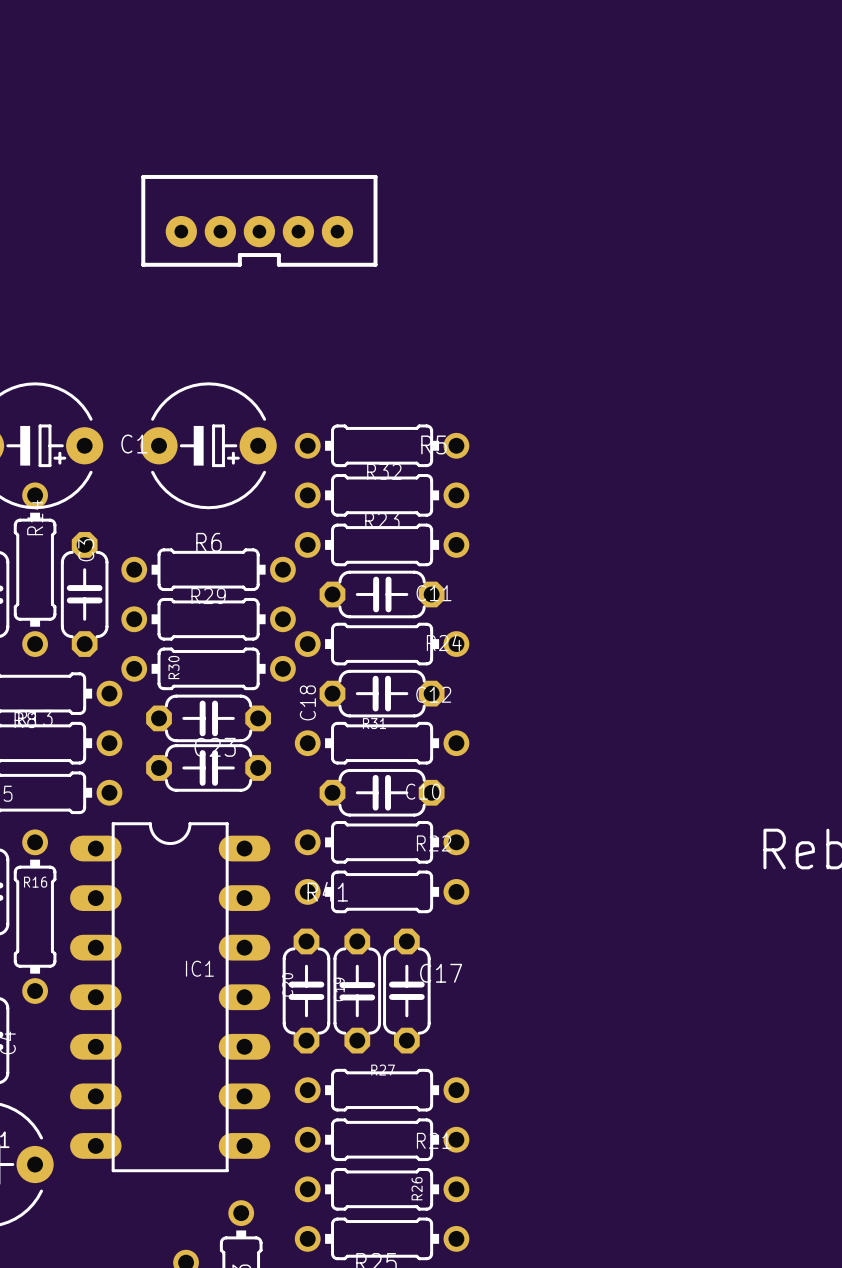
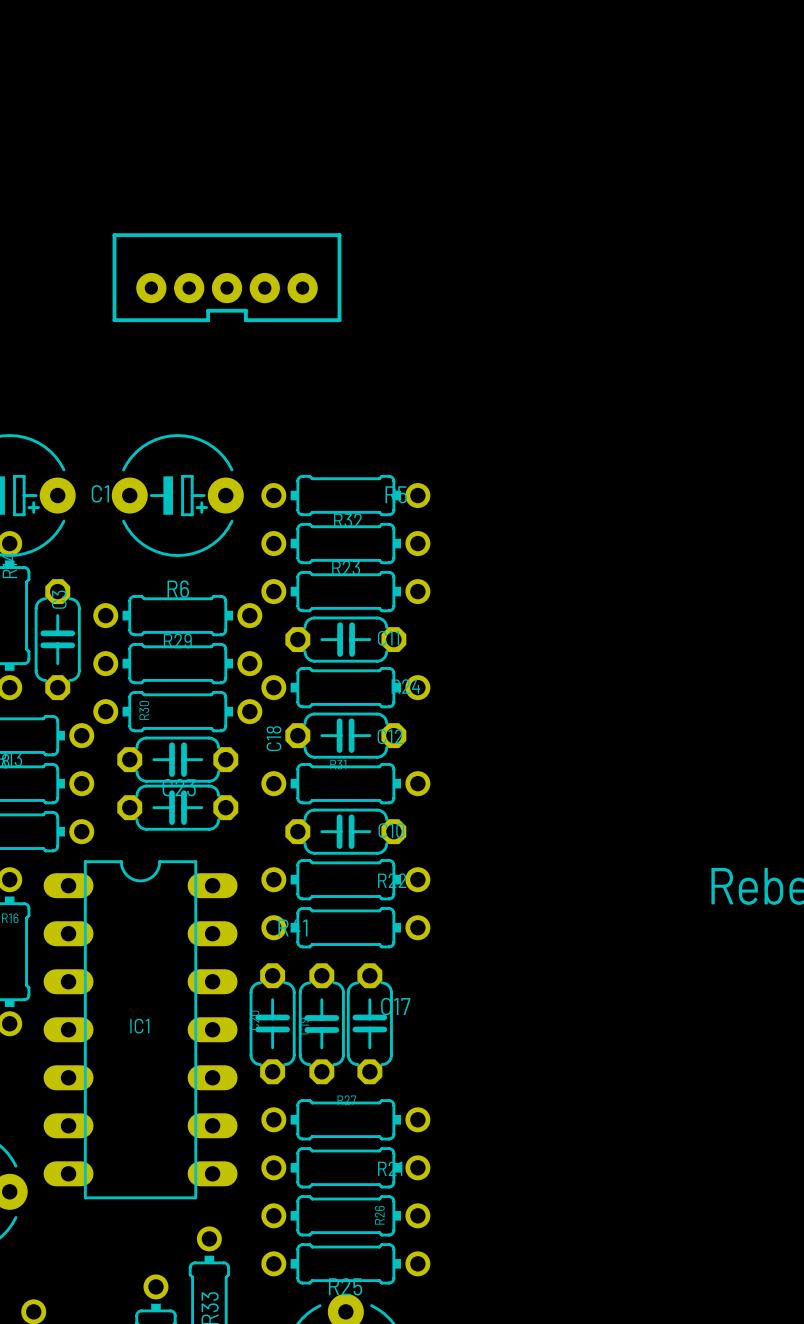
IC1 name position: IC1 (199, 968) -> IC1 (139, 1026)

